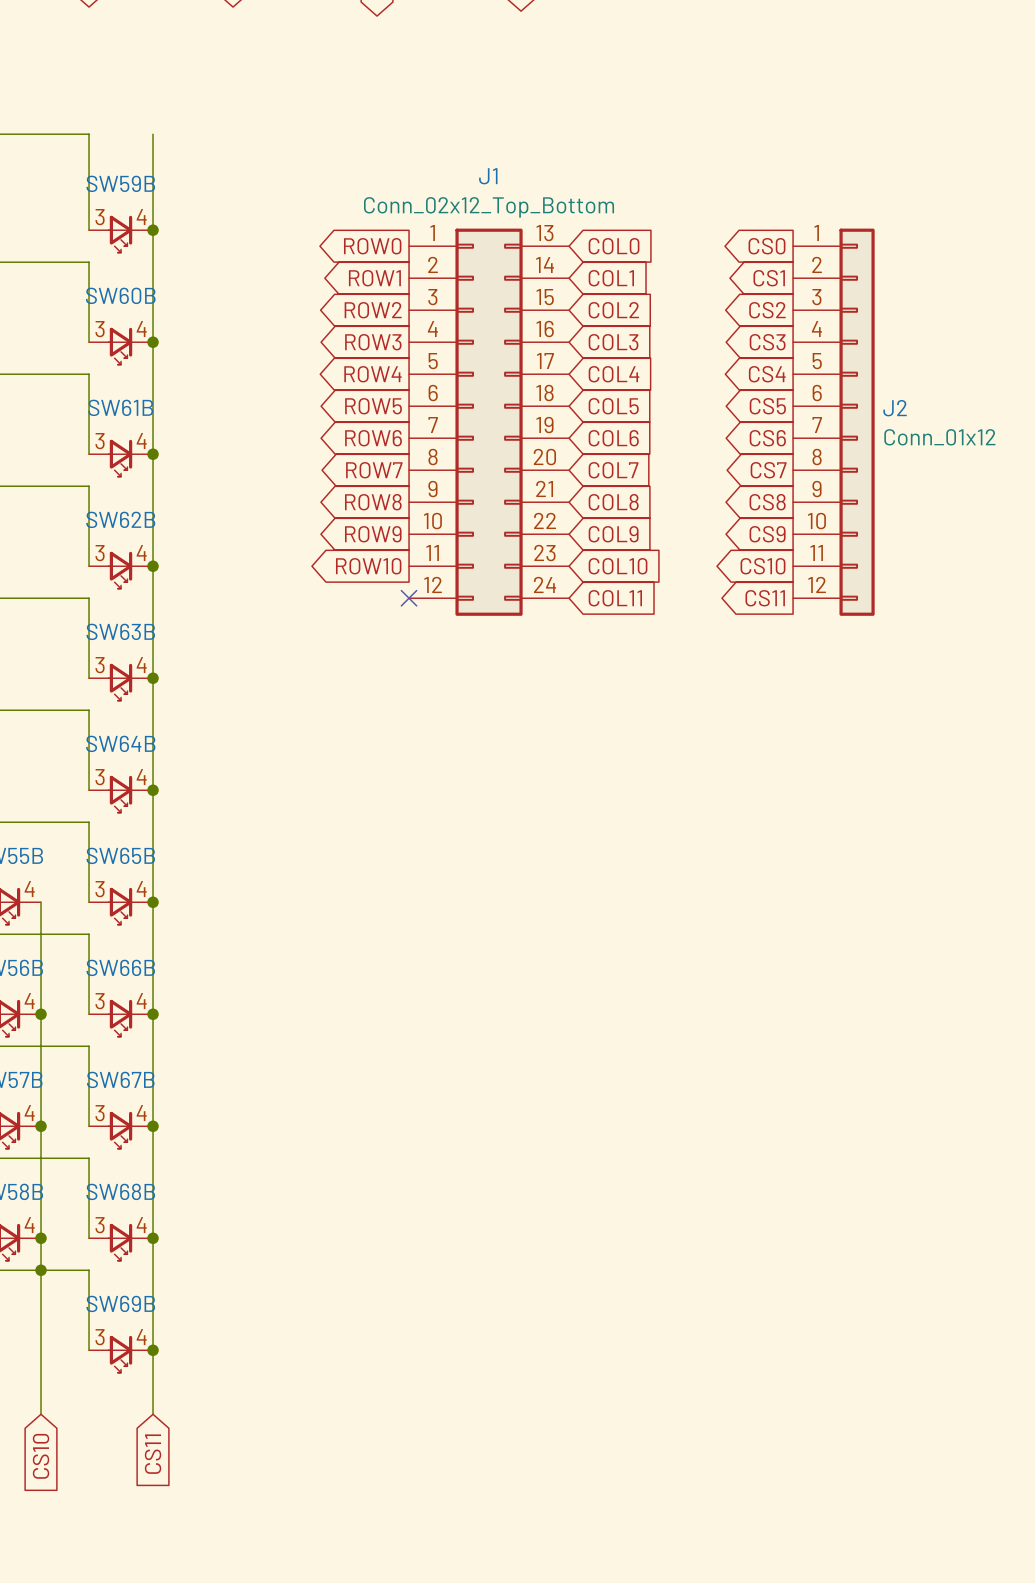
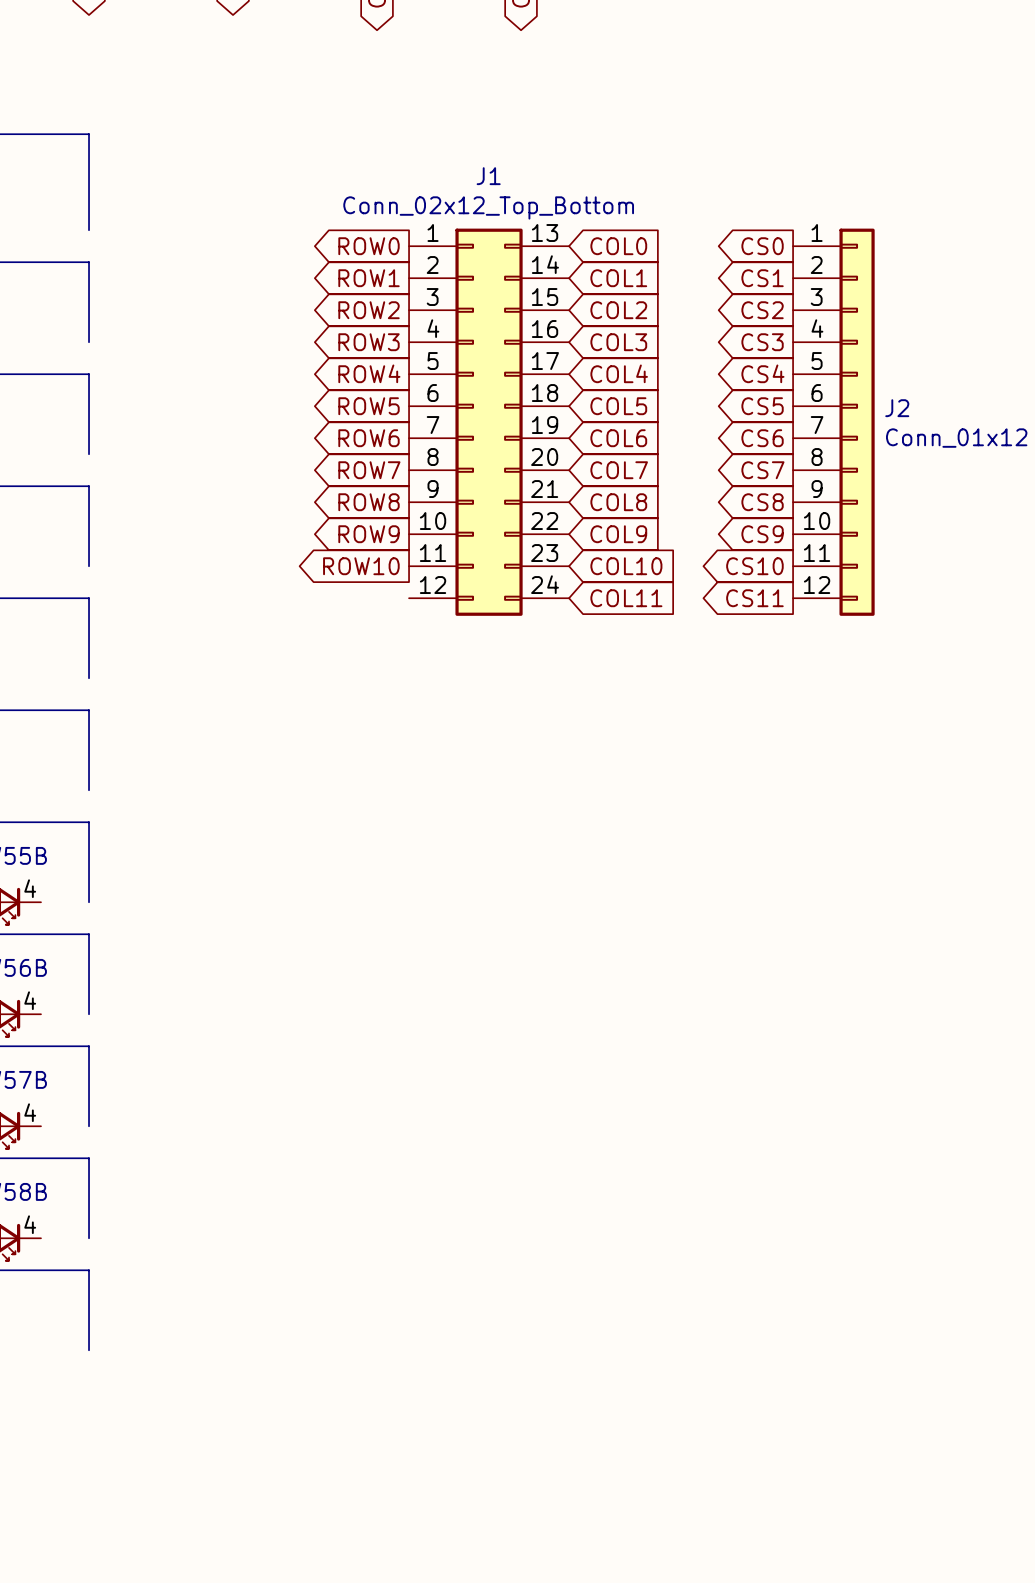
wire: (153, 134) (153, 1414) -> none
junction: (153, 230) -> none
SW59B: (121, 234) -> none
junction: (153, 342) -> none
SW60B: (121, 346) -> none
junction: (153, 454) -> none
SW61B: (121, 458) -> none
junction: (153, 566) -> none
SW62B: (121, 570) -> none
no-connect mark: (409, 598) -> none
junction: (153, 678) -> none
SW63B: (121, 682) -> none
junction: (153, 790) -> none
SW64B: (121, 794) -> none
wire: (41, 902) (41, 1414) -> none
junction: (153, 902) -> none
SW65B: (121, 906) -> none
junction: (41, 1014) -> none
junction: (153, 1014) -> none
SW66B: (121, 1018) -> none
junction: (41, 1126) -> none
junction: (153, 1126) -> none
SW67B: (121, 1130) -> none
junction: (41, 1238) -> none
junction: (153, 1238) -> none
SW68B: (121, 1242) -> none
junction: (41, 1270) -> none
junction: (153, 1350) -> none
SW69B: (121, 1354) -> none
global label: CS11 (153, 1454) -> none
global label: CS10 (41, 1456) -> none

